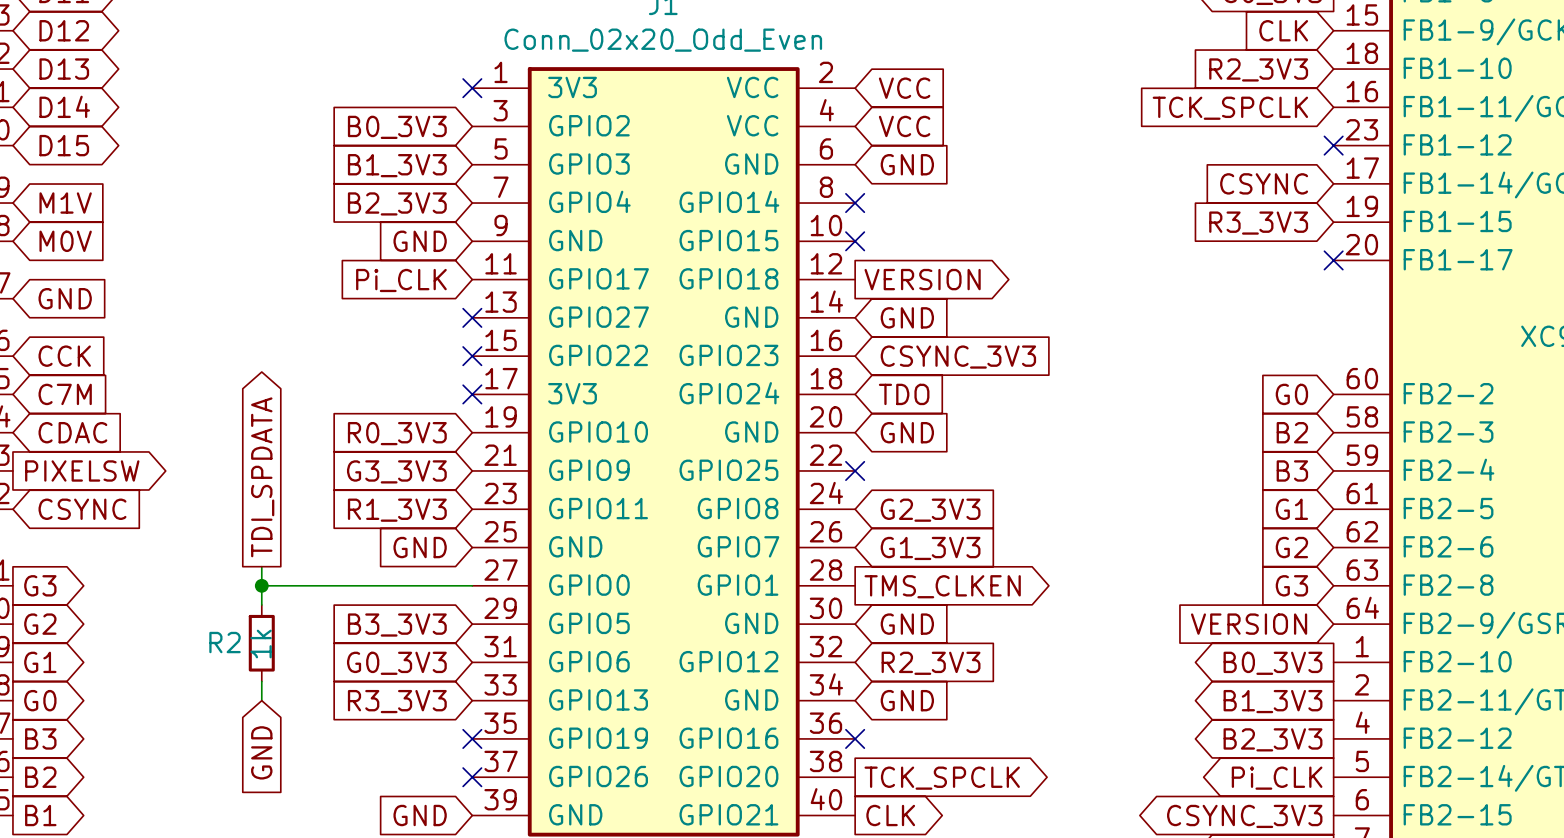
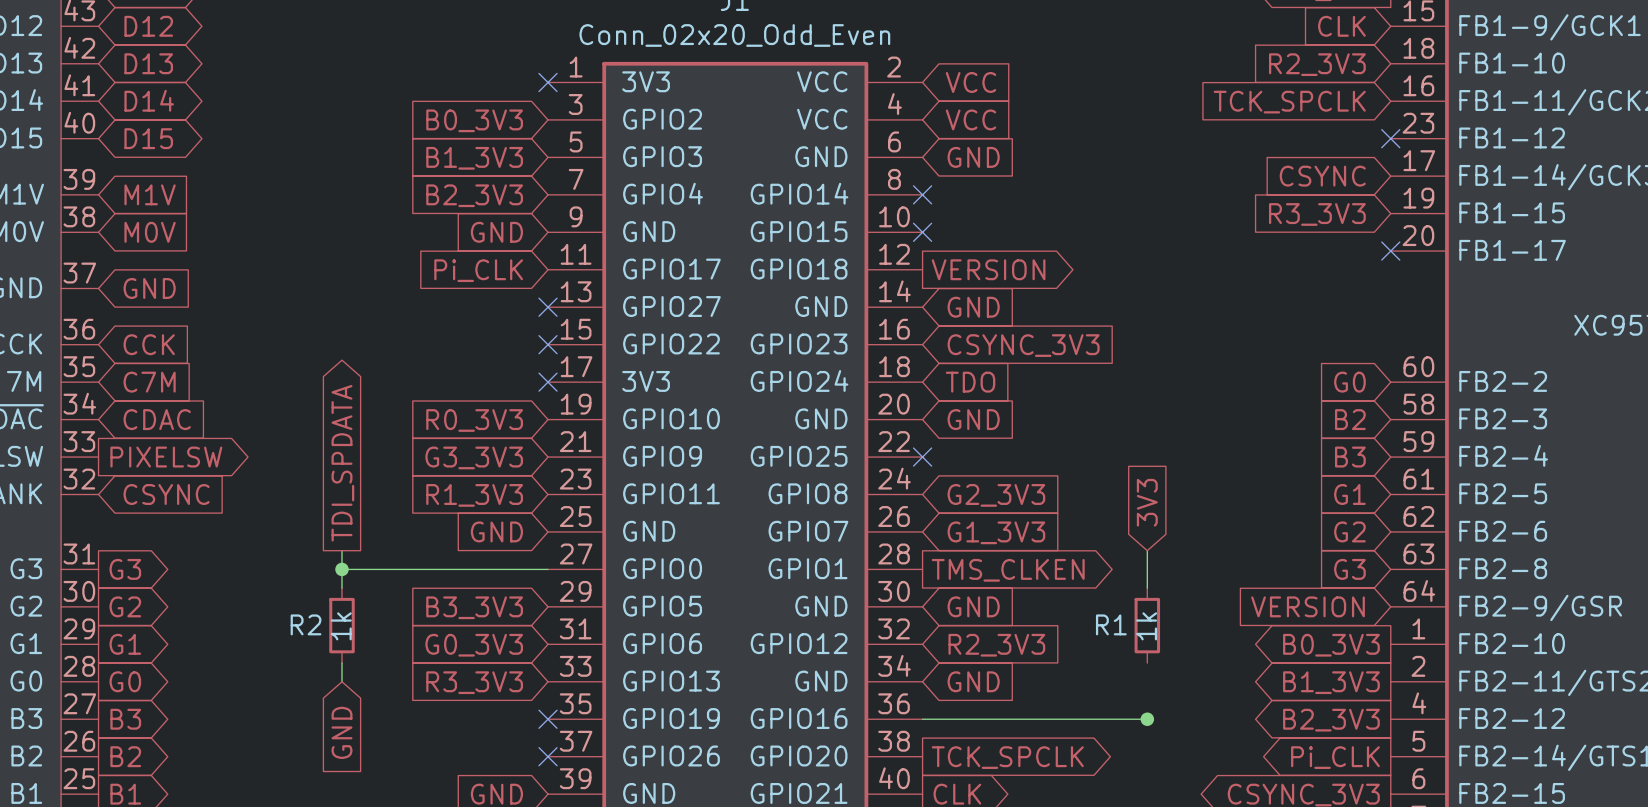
global label: none -> 3V3 (1147, 502)
wire: none -> (1147, 550) (1147, 588)
R1: none -> 1k (1147, 625)
wire: none -> (922, 719) (1147, 719)
no-connect mark: (855, 738) -> none
junction: none -> (1147, 719)

